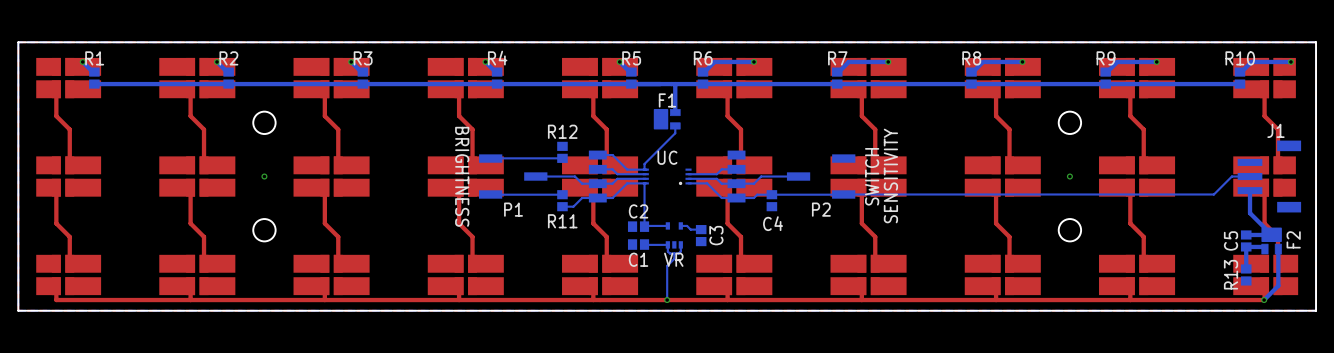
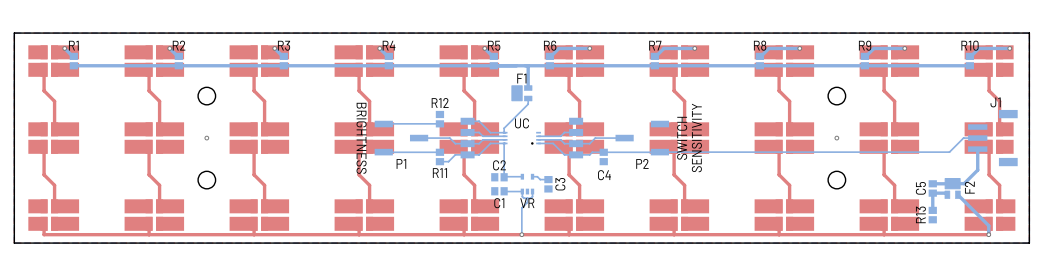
bottom track: (1250, 213) (1271, 234) (1246, 234) -> (977, 166) (977, 170) (964, 183) (932, 183)
text: F2 (1293, 239) -> none
text: none -> C5 (920, 188)
part: none -> (932, 188)
text: C5 (1231, 240) -> F2 (969, 187)
part: (1246, 240) -> none
part position: (1271, 240) -> (952, 188)
bottom track: (1264, 249) (1262, 246) (1246, 246) (1246, 268) -> (947, 194) (932, 193) (932, 210)
bottom track: (1278, 249) (1278, 285) (1264, 300) -> (957, 194) (988, 225) (988, 234)
part: none -> (932, 215)
text position: R13 (1231, 274) -> R13 (920, 214)
part: (1246, 274) -> none

